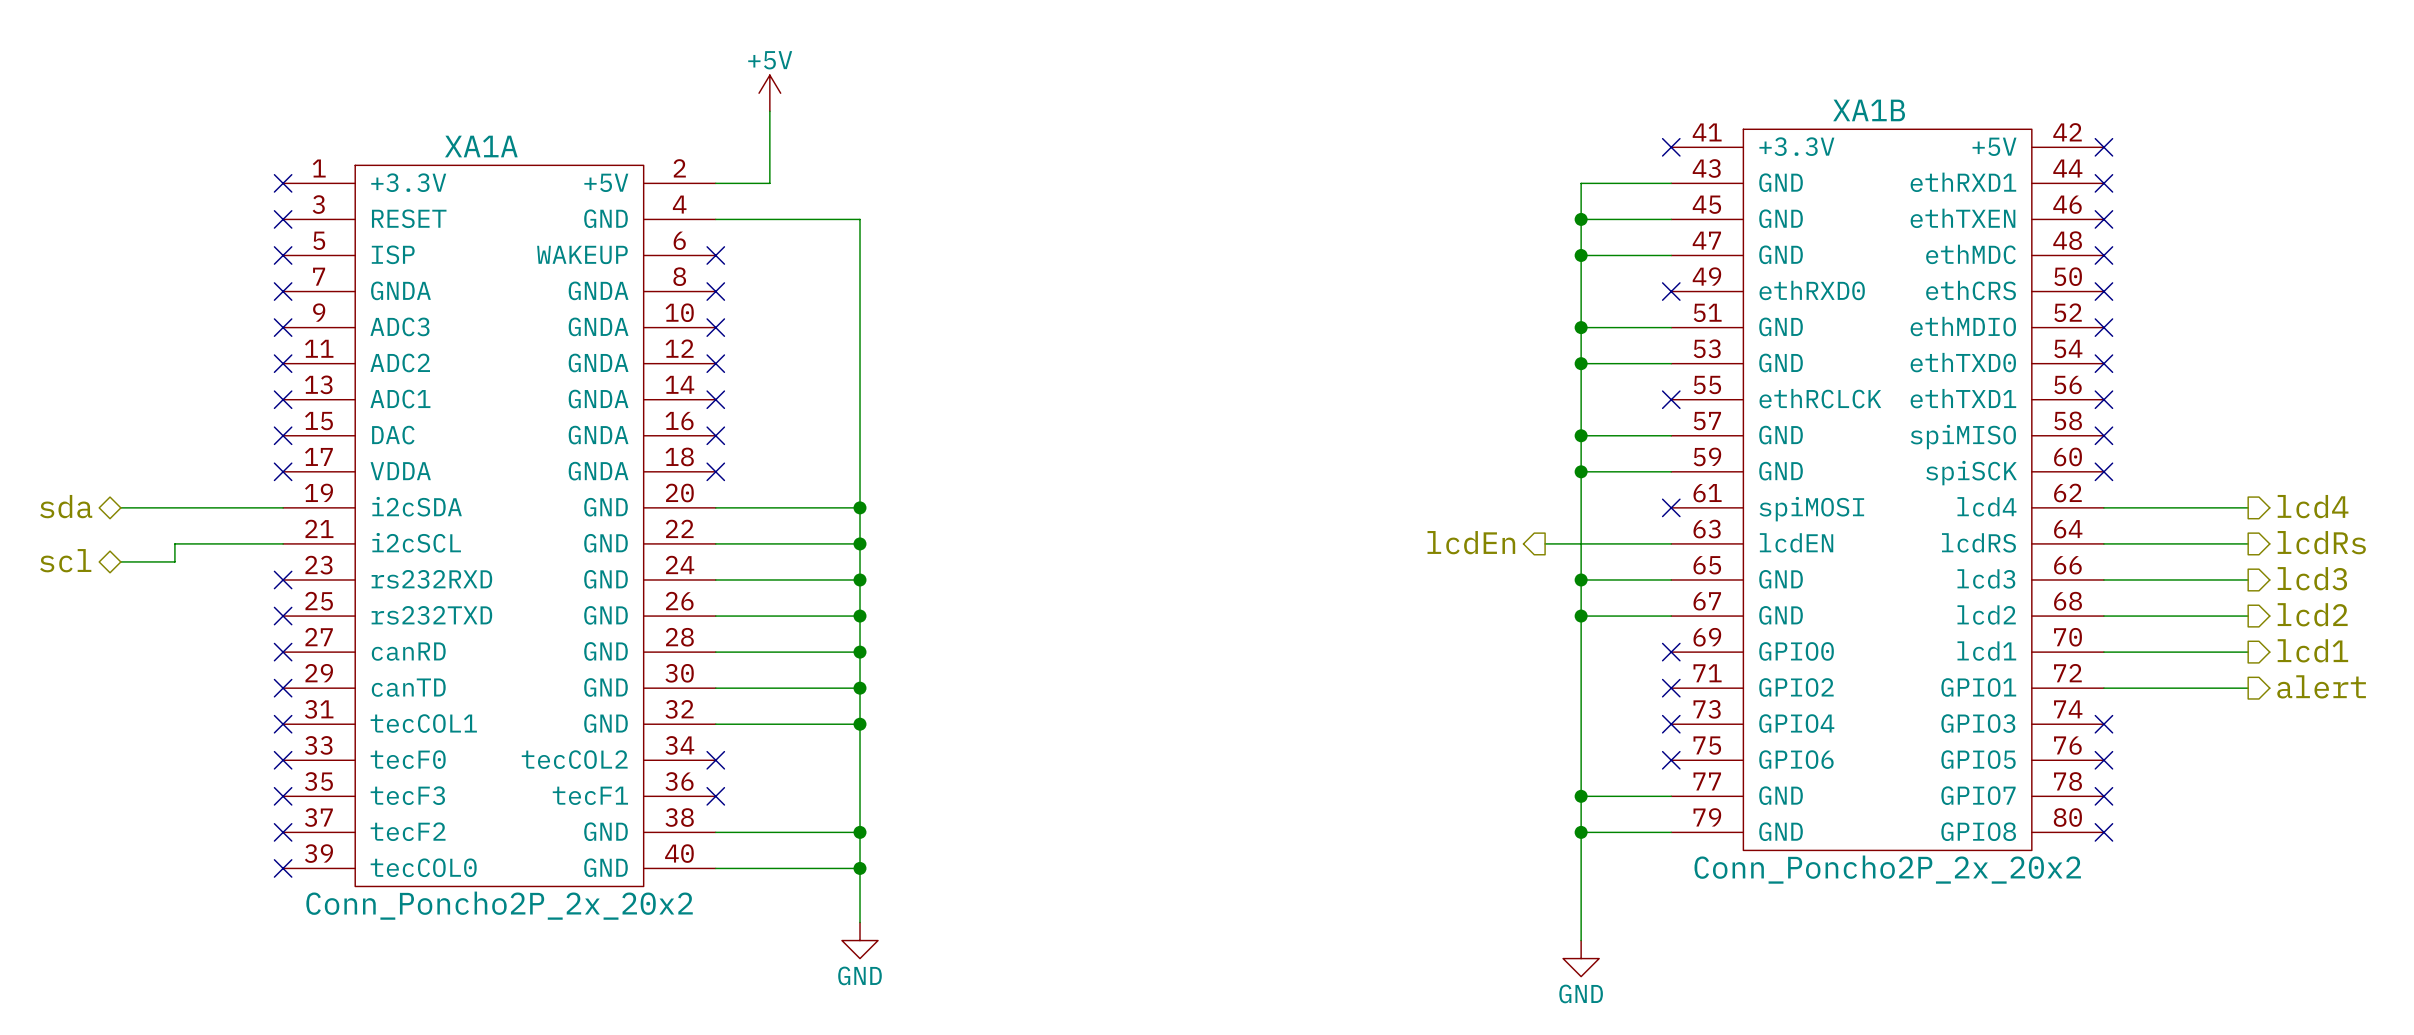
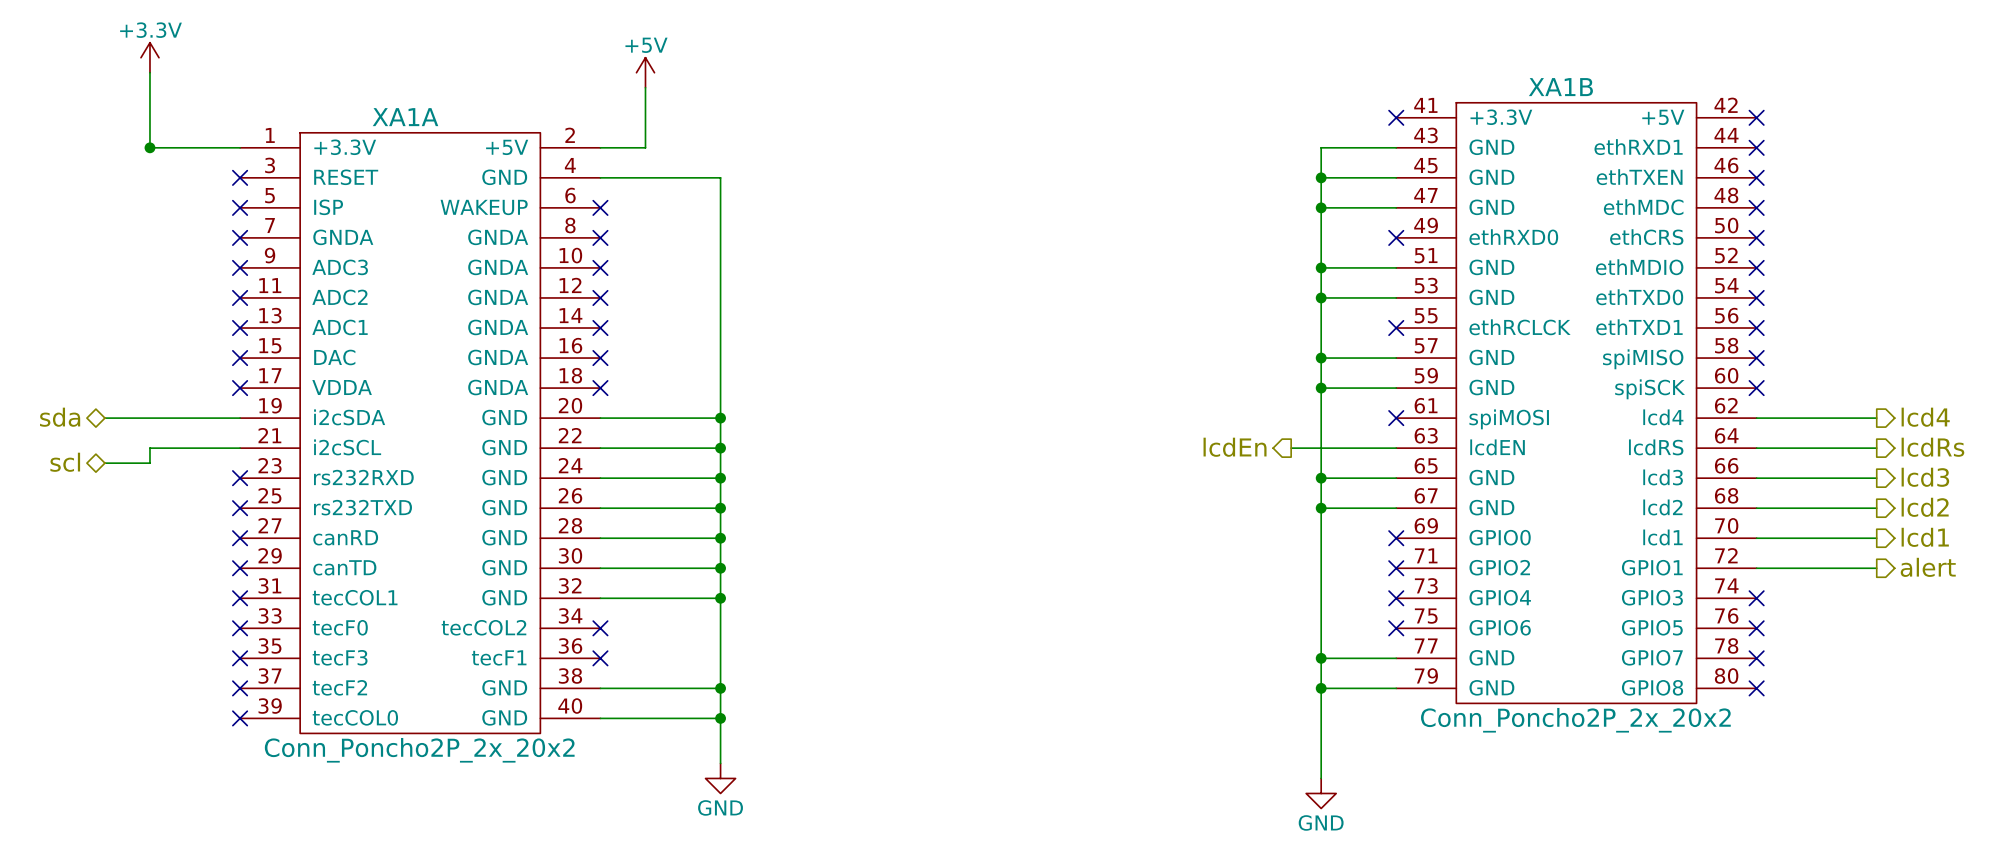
power symbol: none -> +3.3V (149, 57)
wire: none -> (149, 72) (149, 147) (240, 147)
junction: none -> (149, 147)
no-connect mark: (283, 183) -> none

